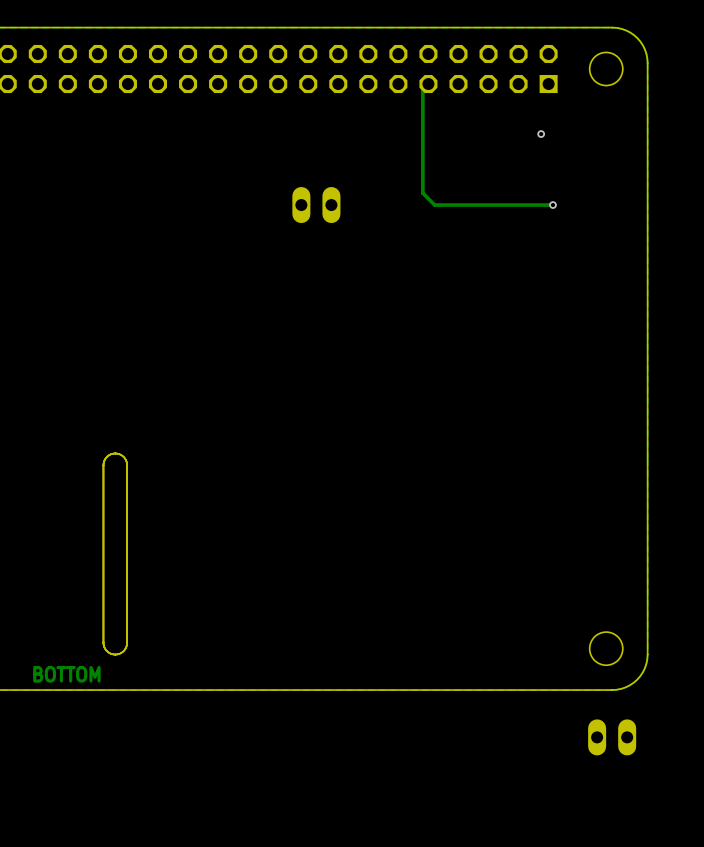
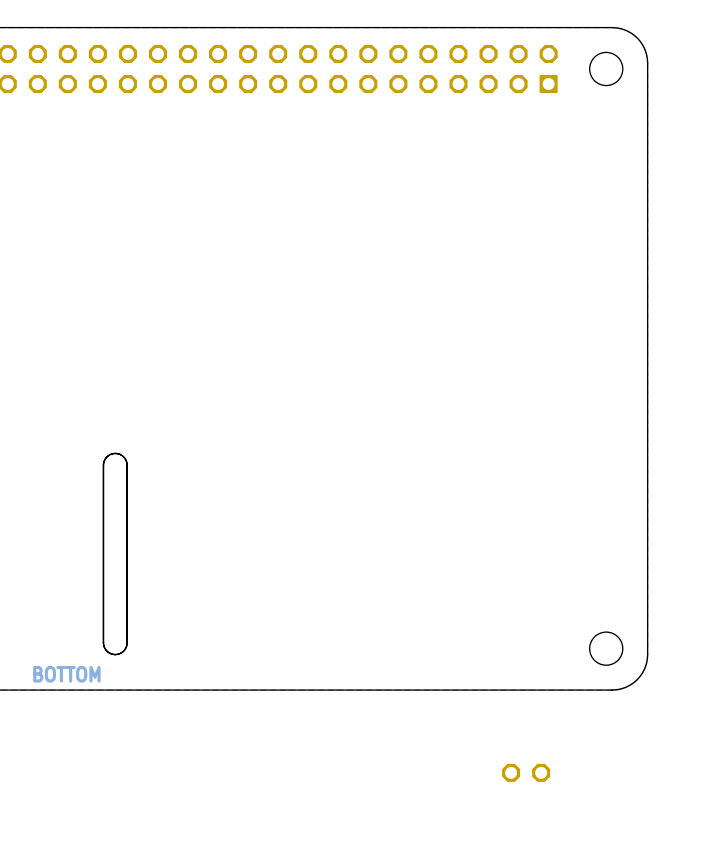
track: (428, 84) (422, 89) (422, 193) (434, 205) (552, 205) -> none
via: (541, 134) -> none
part: (316, 205) -> none
via: (552, 205) -> none
part: (612, 737) -> none
part: none -> (526, 772)

